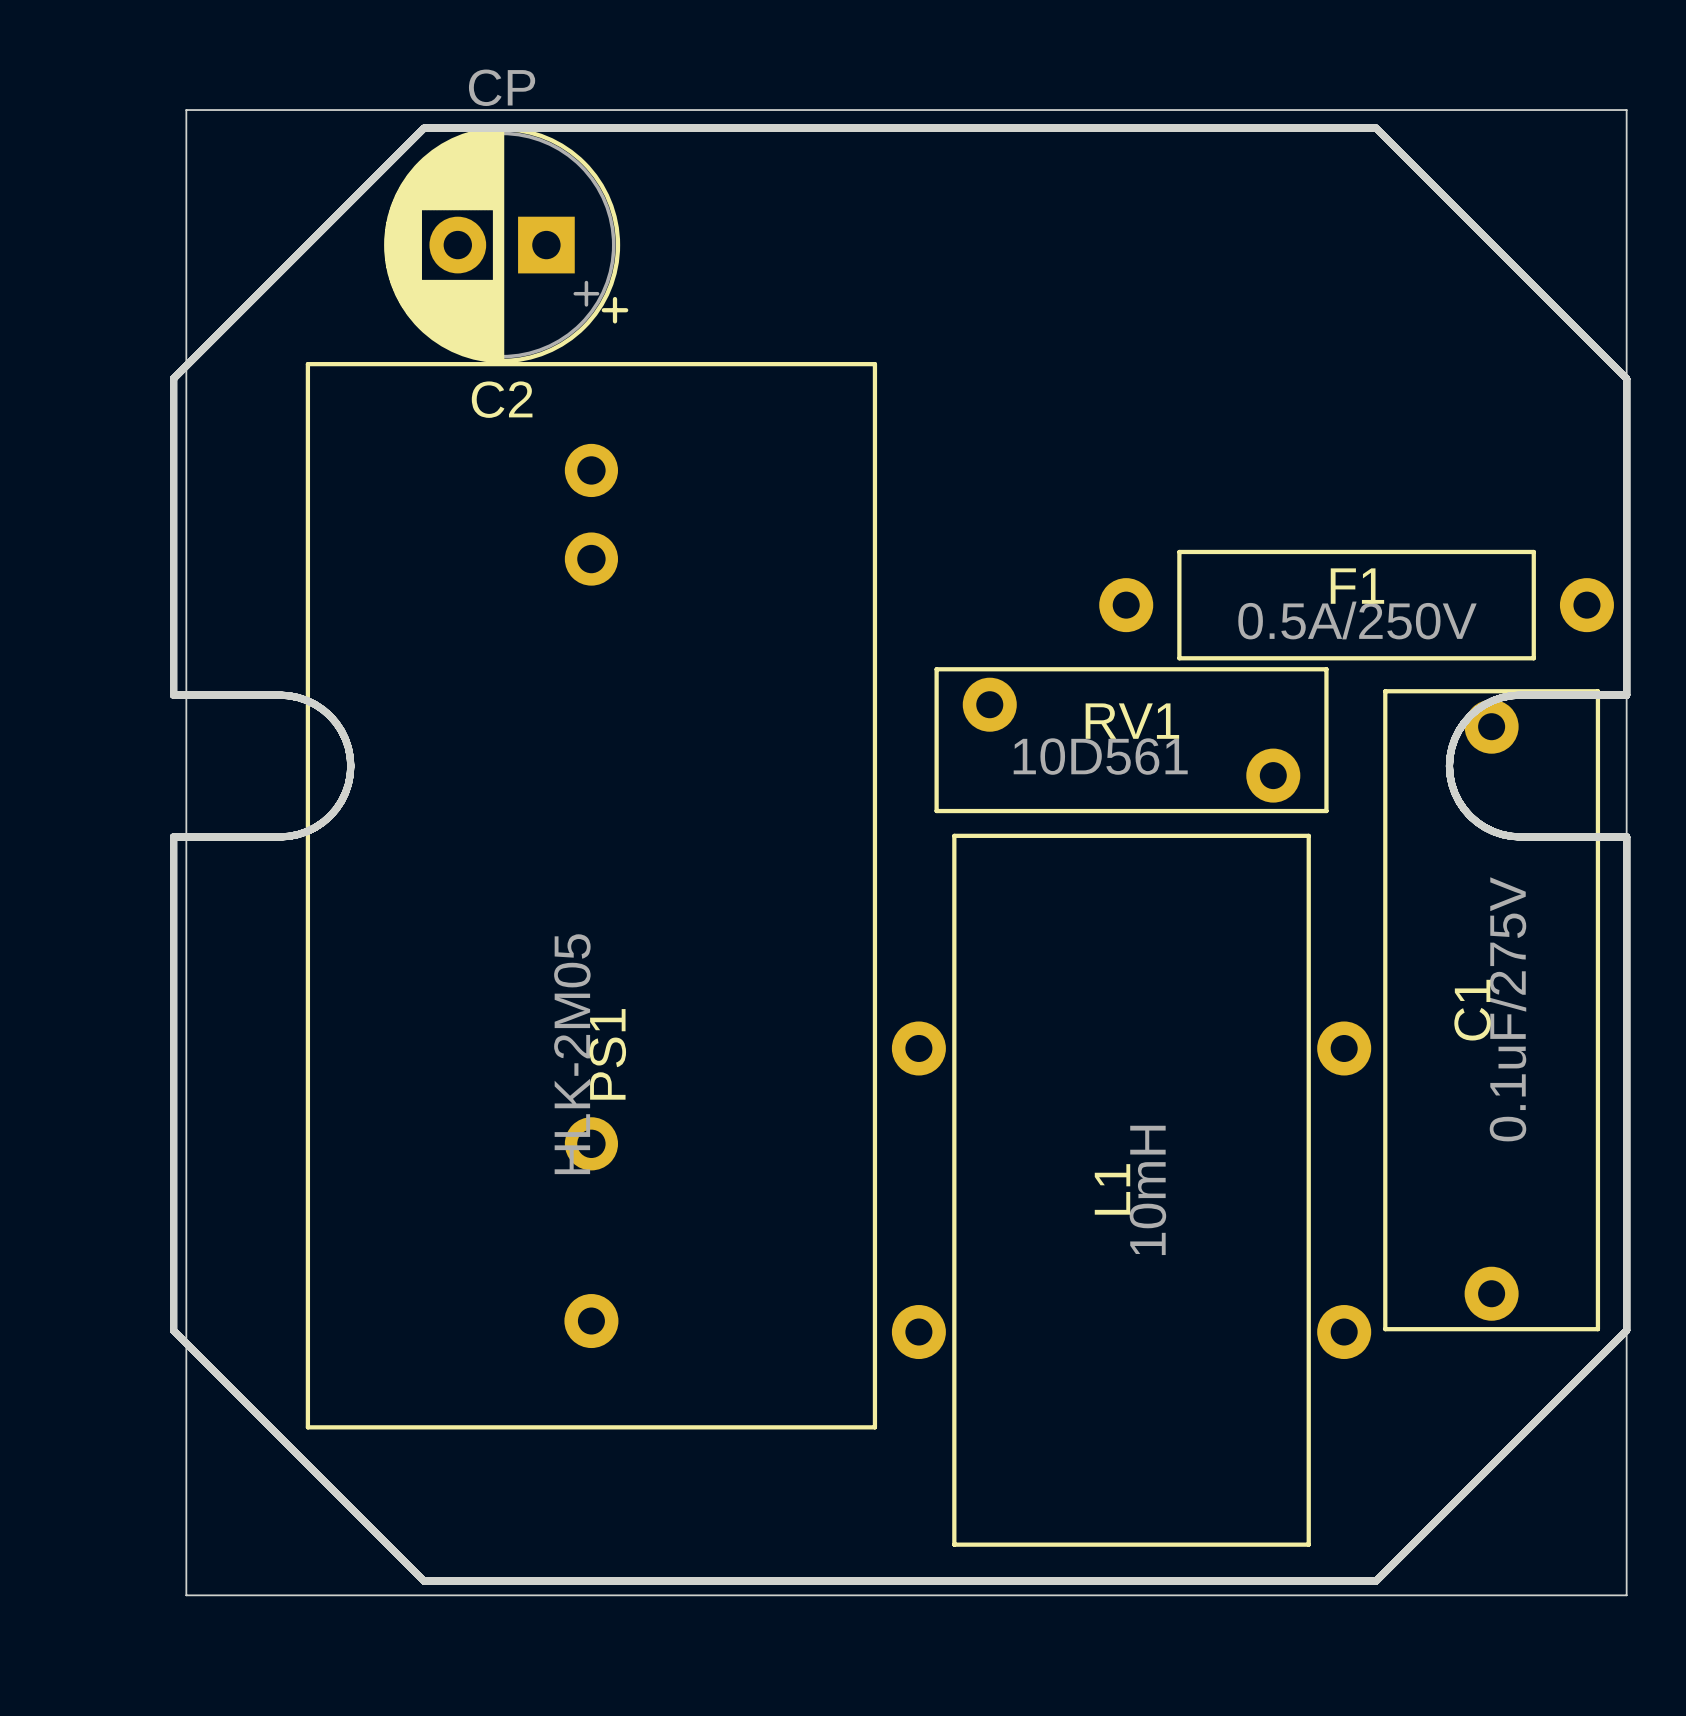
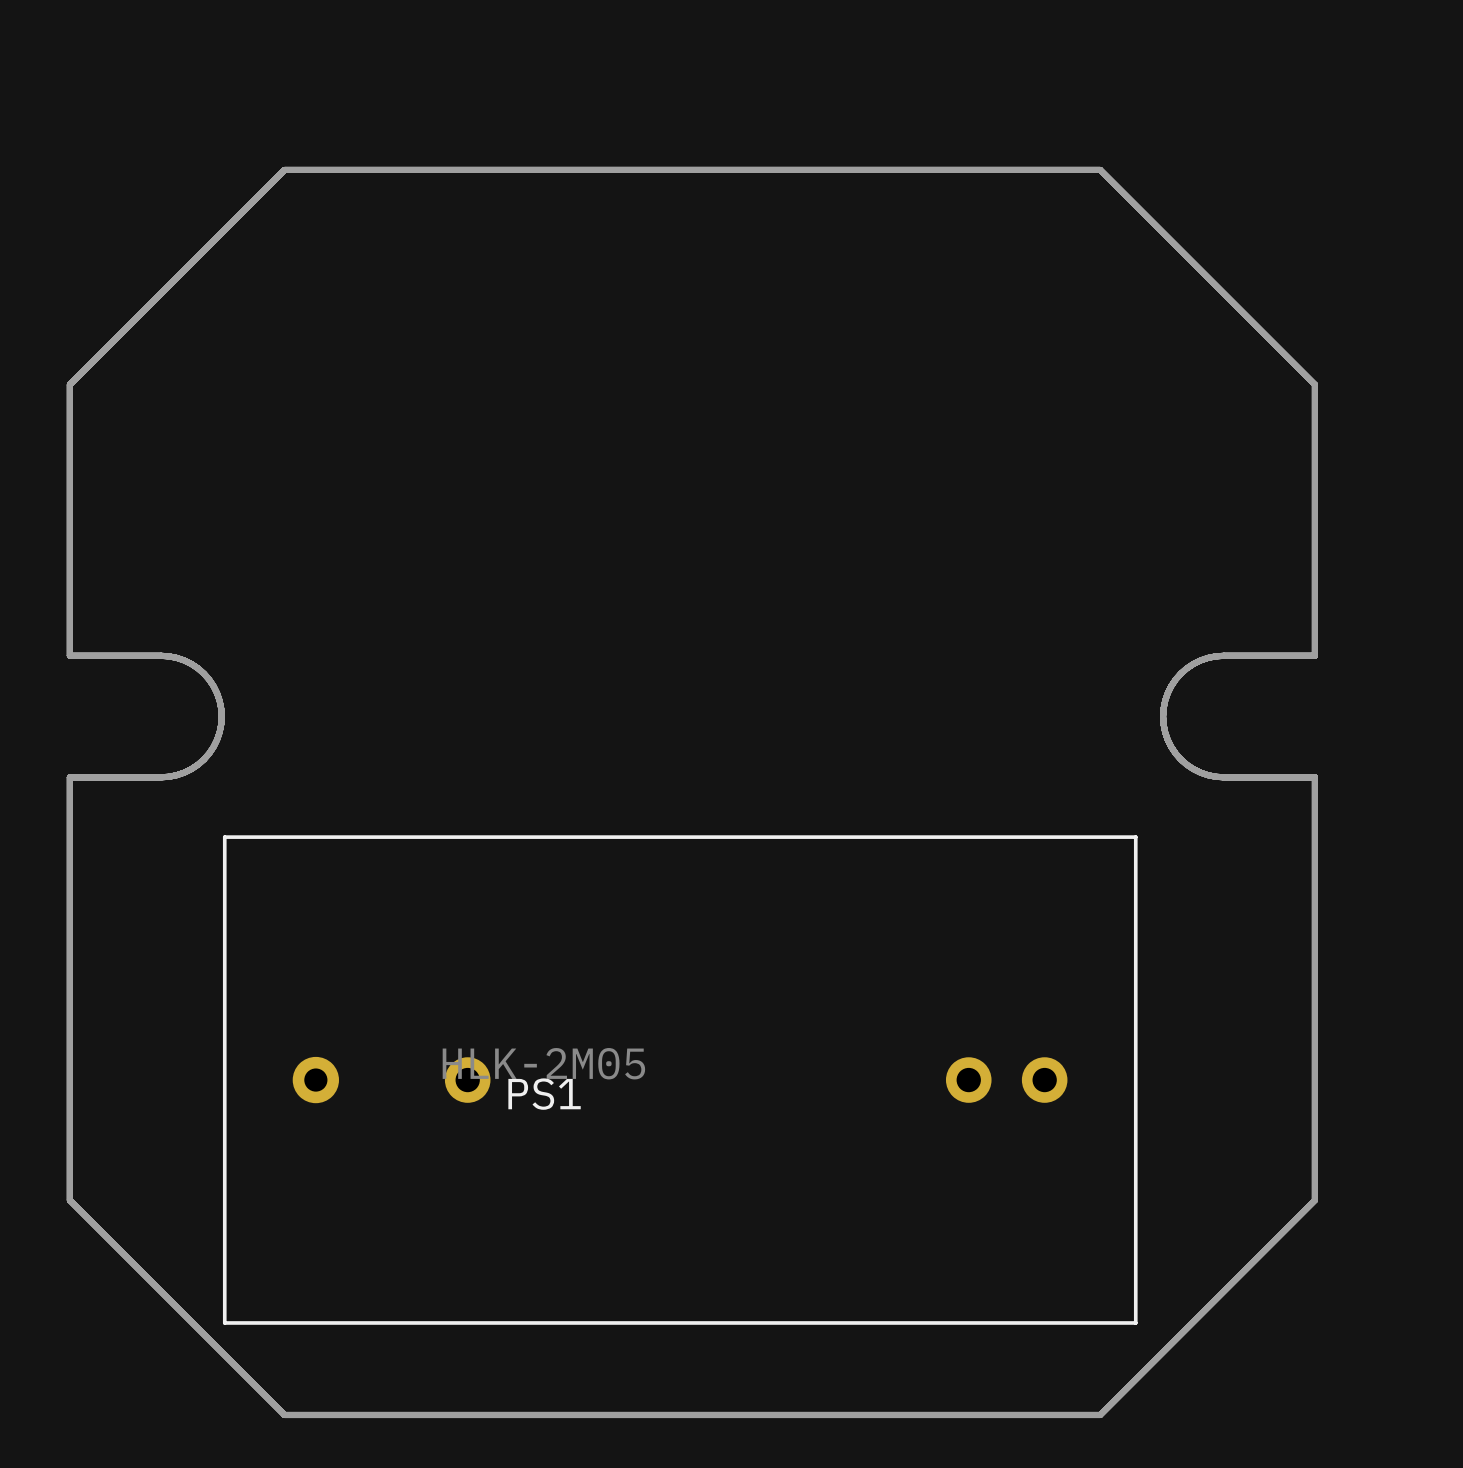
board edge: (186, 110) (1626, 110) (1626, 1595) (186, 1595) (186, 110) -> none
C2: CP (506, 245) -> none
F1: 0.5A/250V (1356, 605) -> none
RV1: 10D561 (1131, 740) -> none
PS1 rotation: 0° (591, 895) -> 90° clockwise (680, 1080)
C1: 0.1uF/275V (1491, 1010) -> none
L1: 10mH (1131, 1190) -> none

